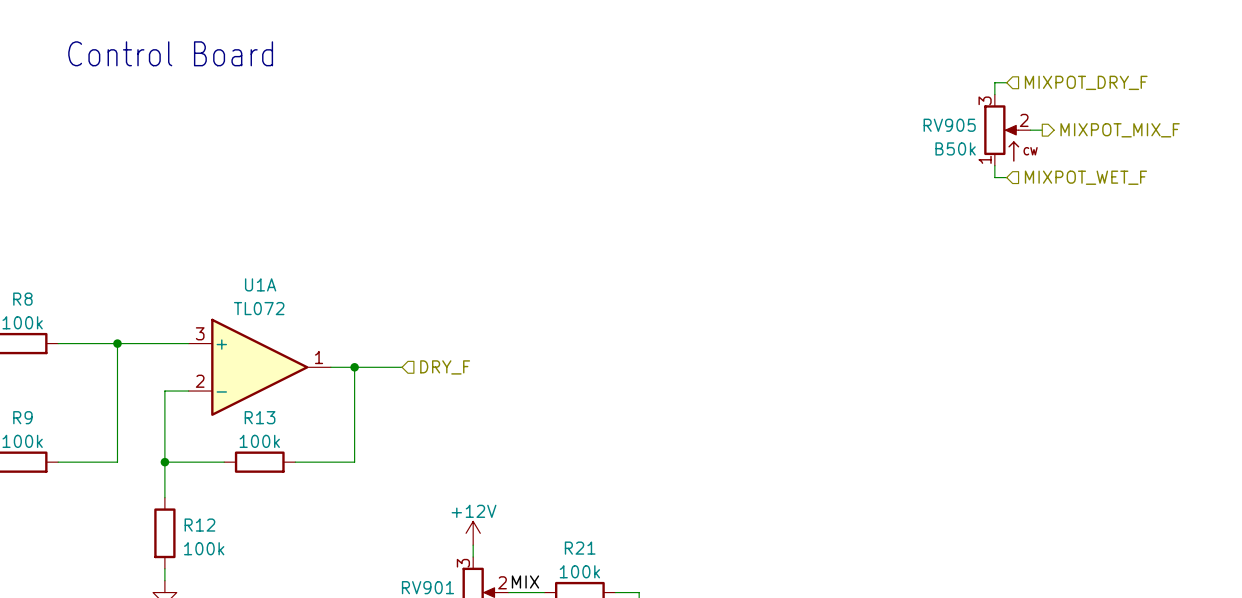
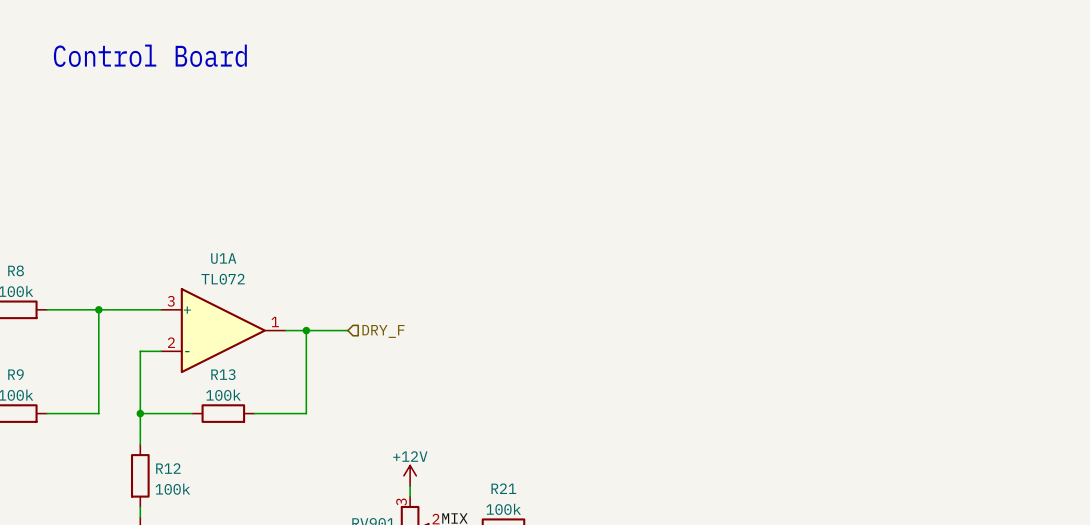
wire: (1006, 82) (994, 82) (994, 94) -> none
hierarchical label: MIXPOT_DRY_F (1086, 82) -> none
RV905: B50k (1007, 130) -> none
wire: (1030, 130) (1042, 130) -> none
hierarchical label: MIXPOT_MIX_F (1120, 130) -> none
wire: (994, 165) (994, 177) (1006, 177) -> none
hierarchical label: MIXPOT_WET_F (1085, 177) -> none

